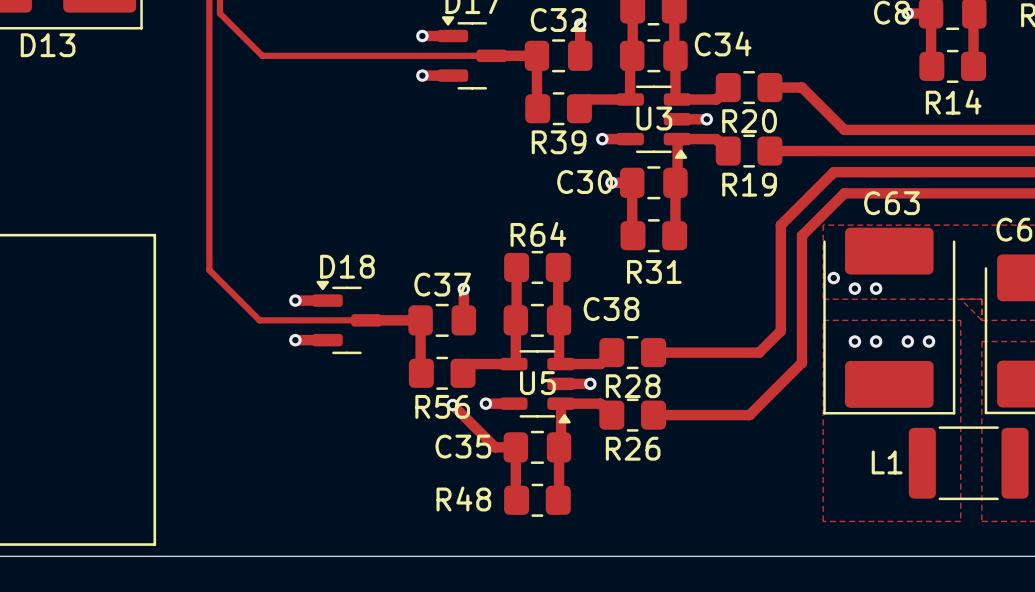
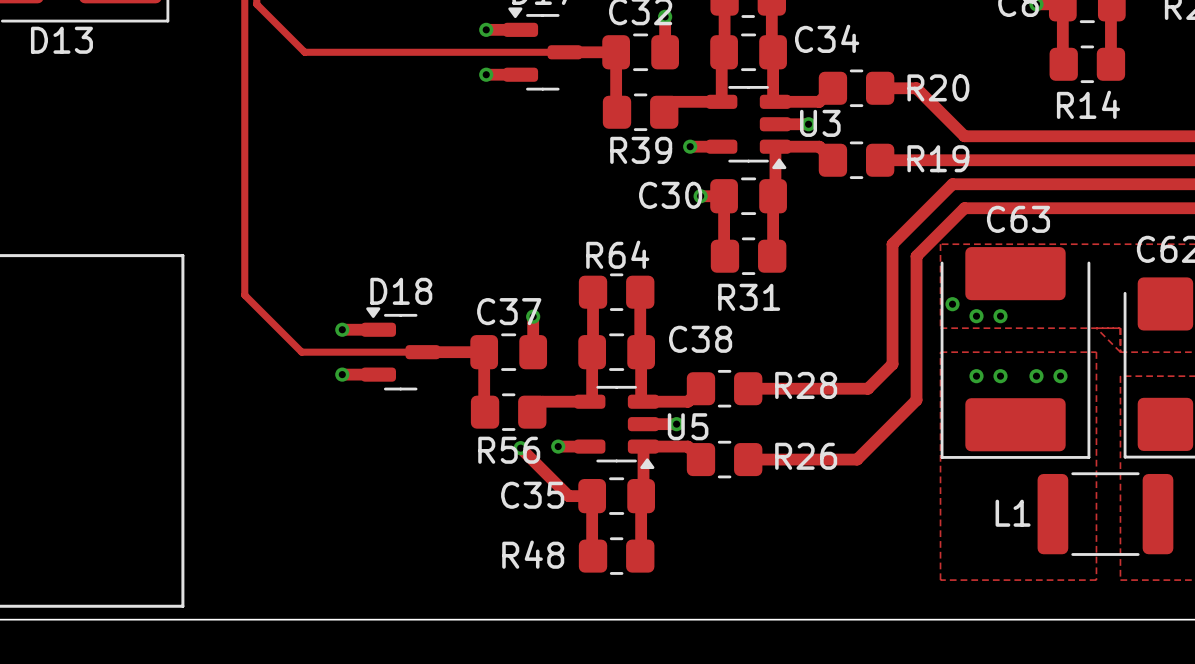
U3 name position: U3 (654, 118) -> U3 (820, 123)
R20 name position: R20 (749, 121) -> R20 (938, 87)
R19 name position: R19 (749, 184) -> R19 (938, 158)
U5 name position: U5 (537, 383) -> U5 (688, 426)
R28 name position: R28 (633, 386) -> R28 (806, 385)
R26 name position: R26 (633, 448) -> R26 (806, 456)

